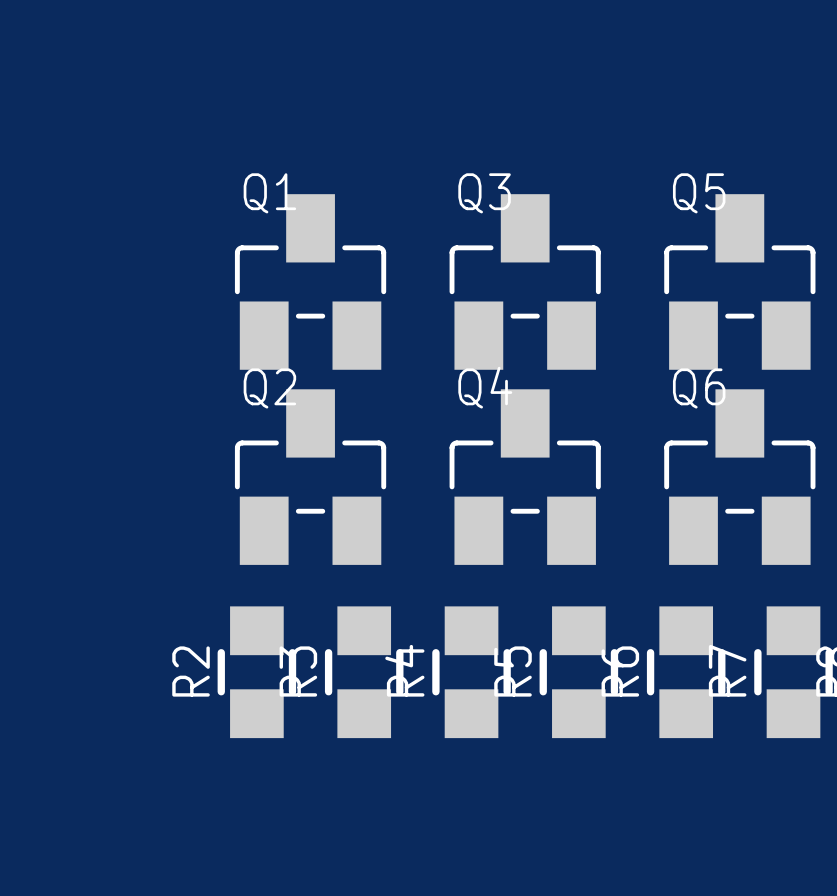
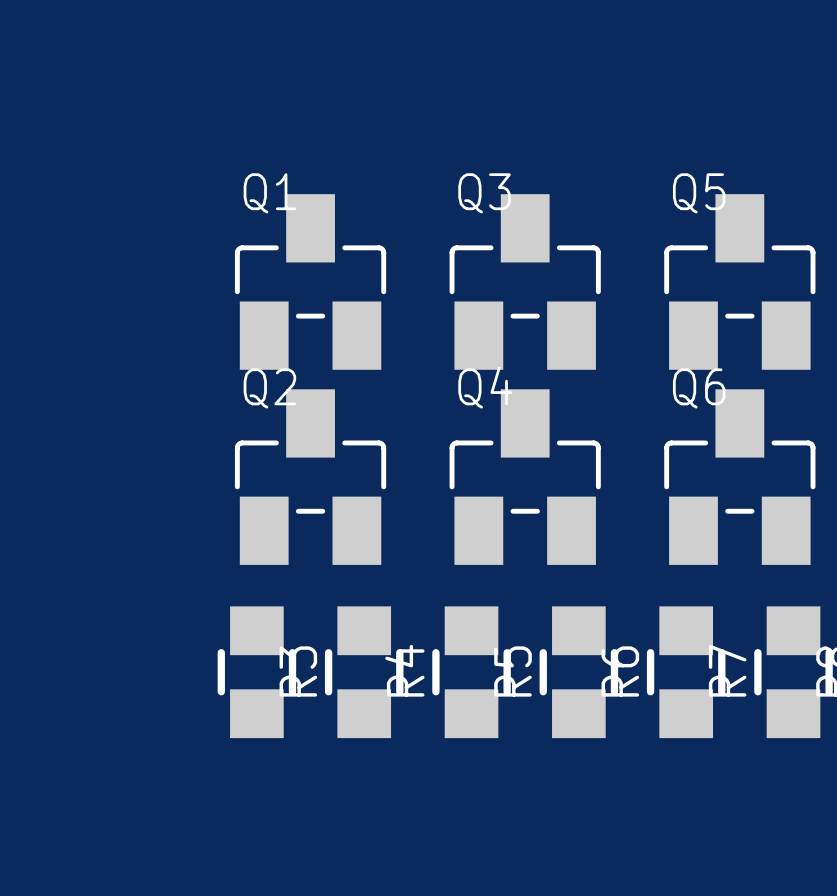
R2 name: R2 (191, 671) -> none

